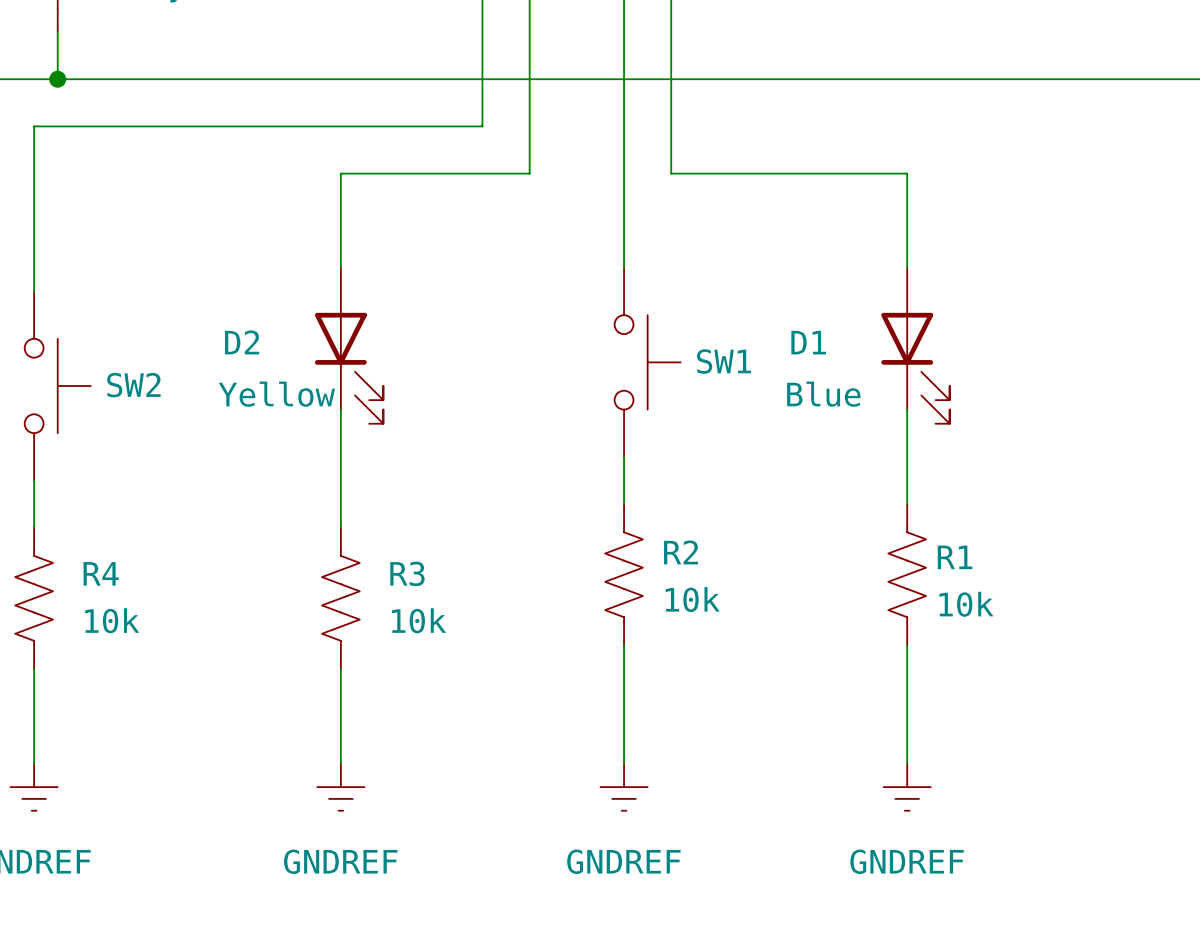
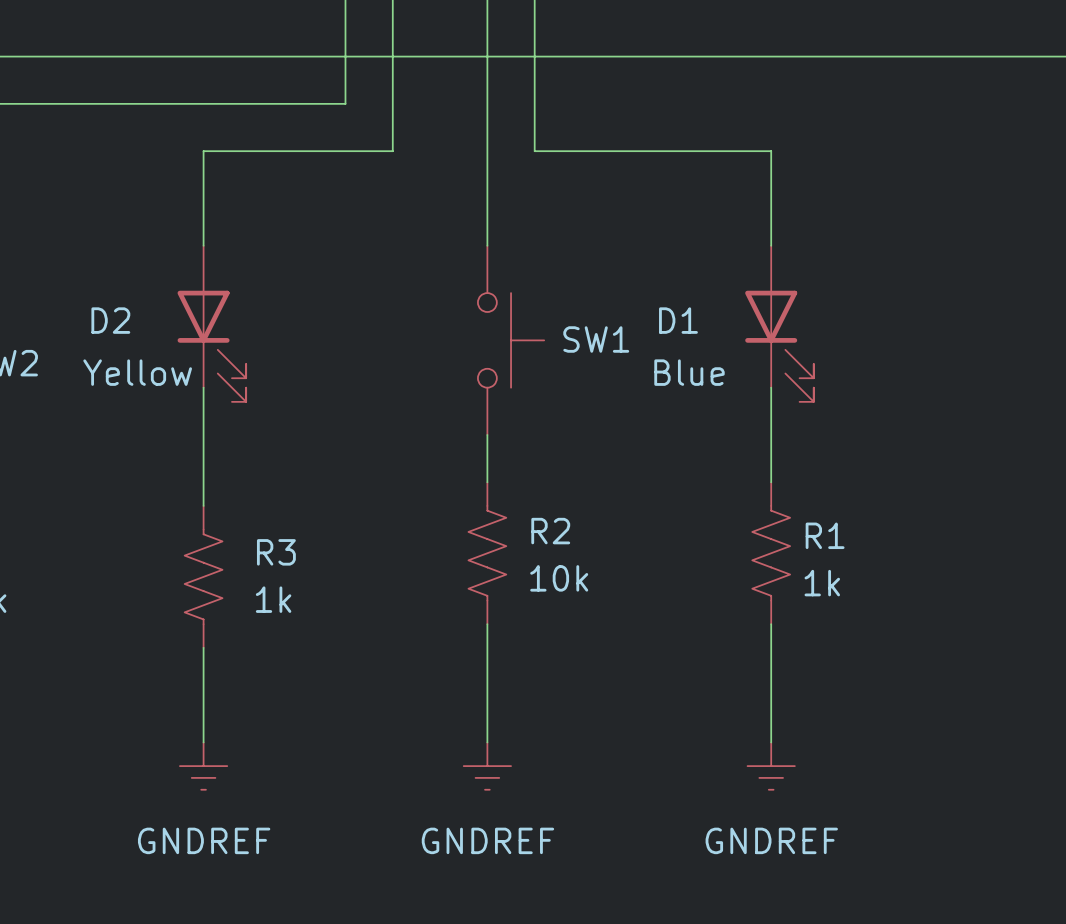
R1 value: 10k (966, 604) -> 1k (822, 583)
R3 value: 10k (419, 620) -> 1k (273, 599)

